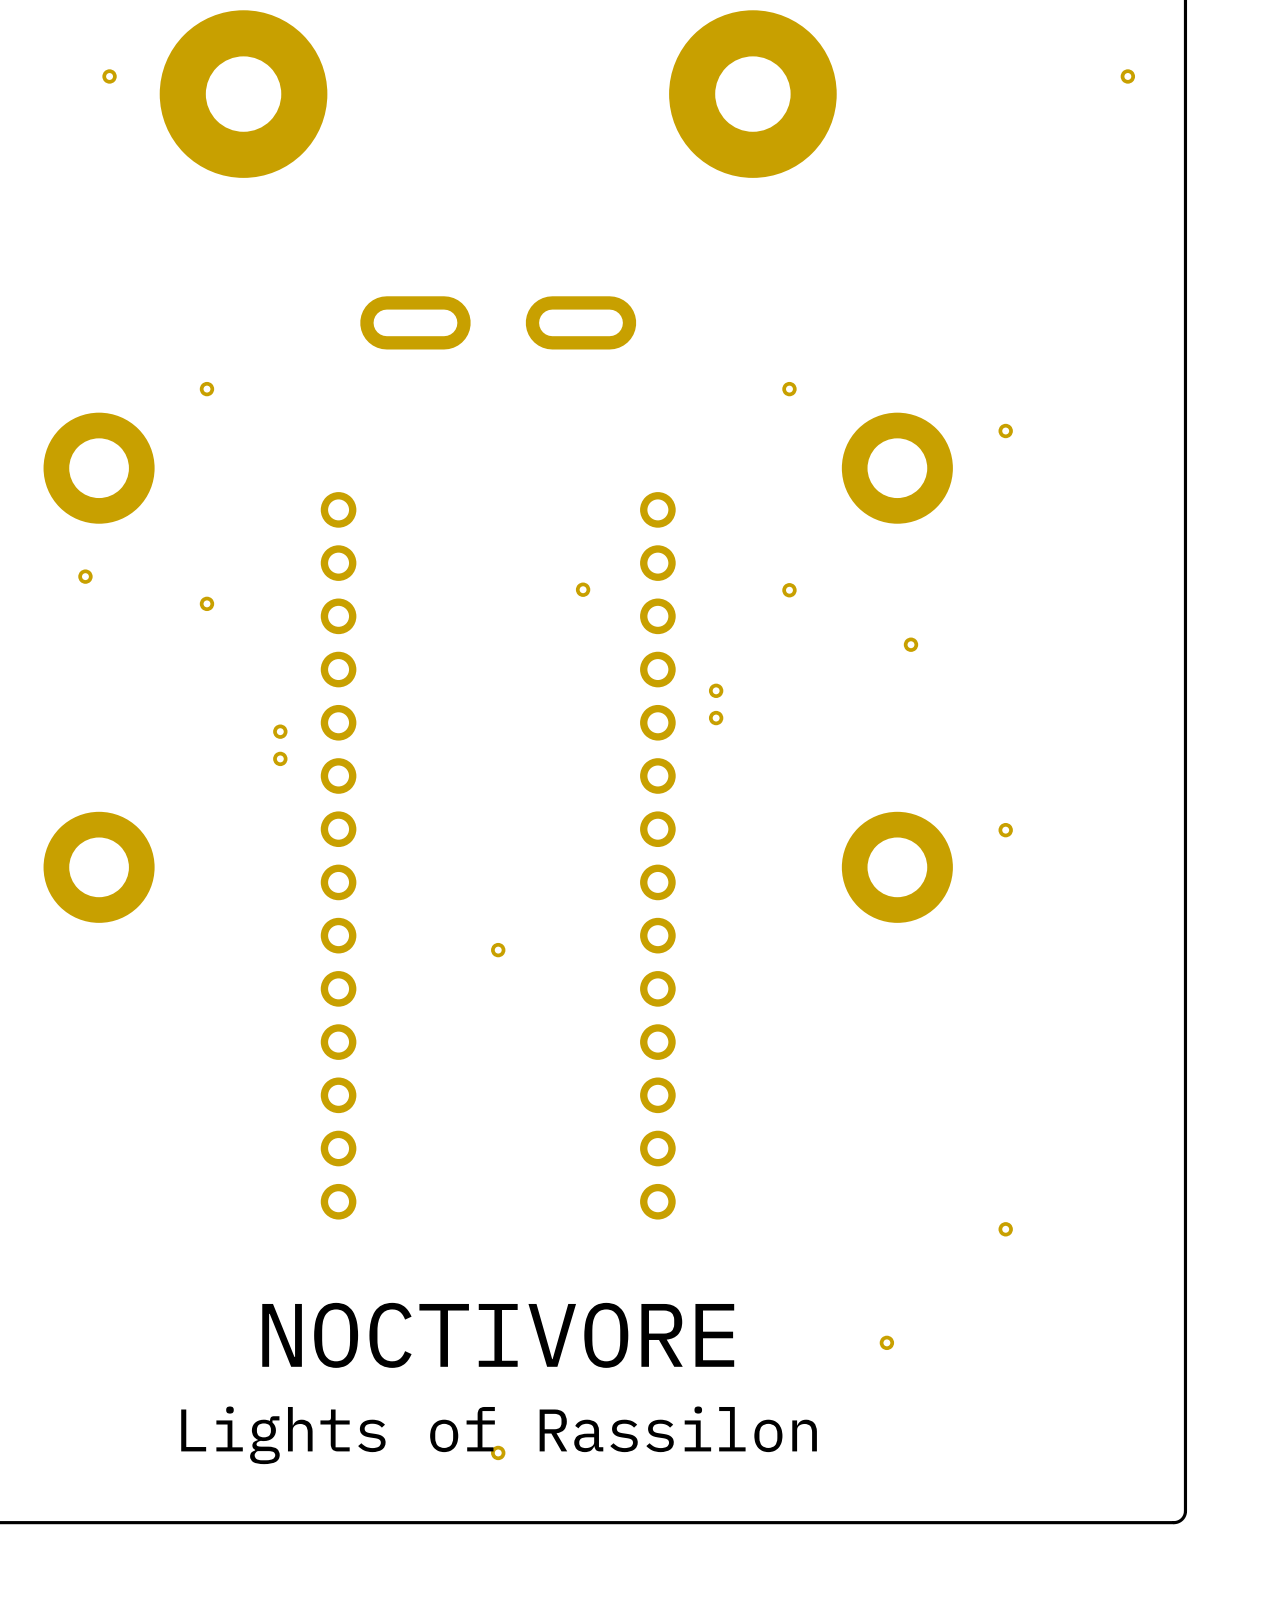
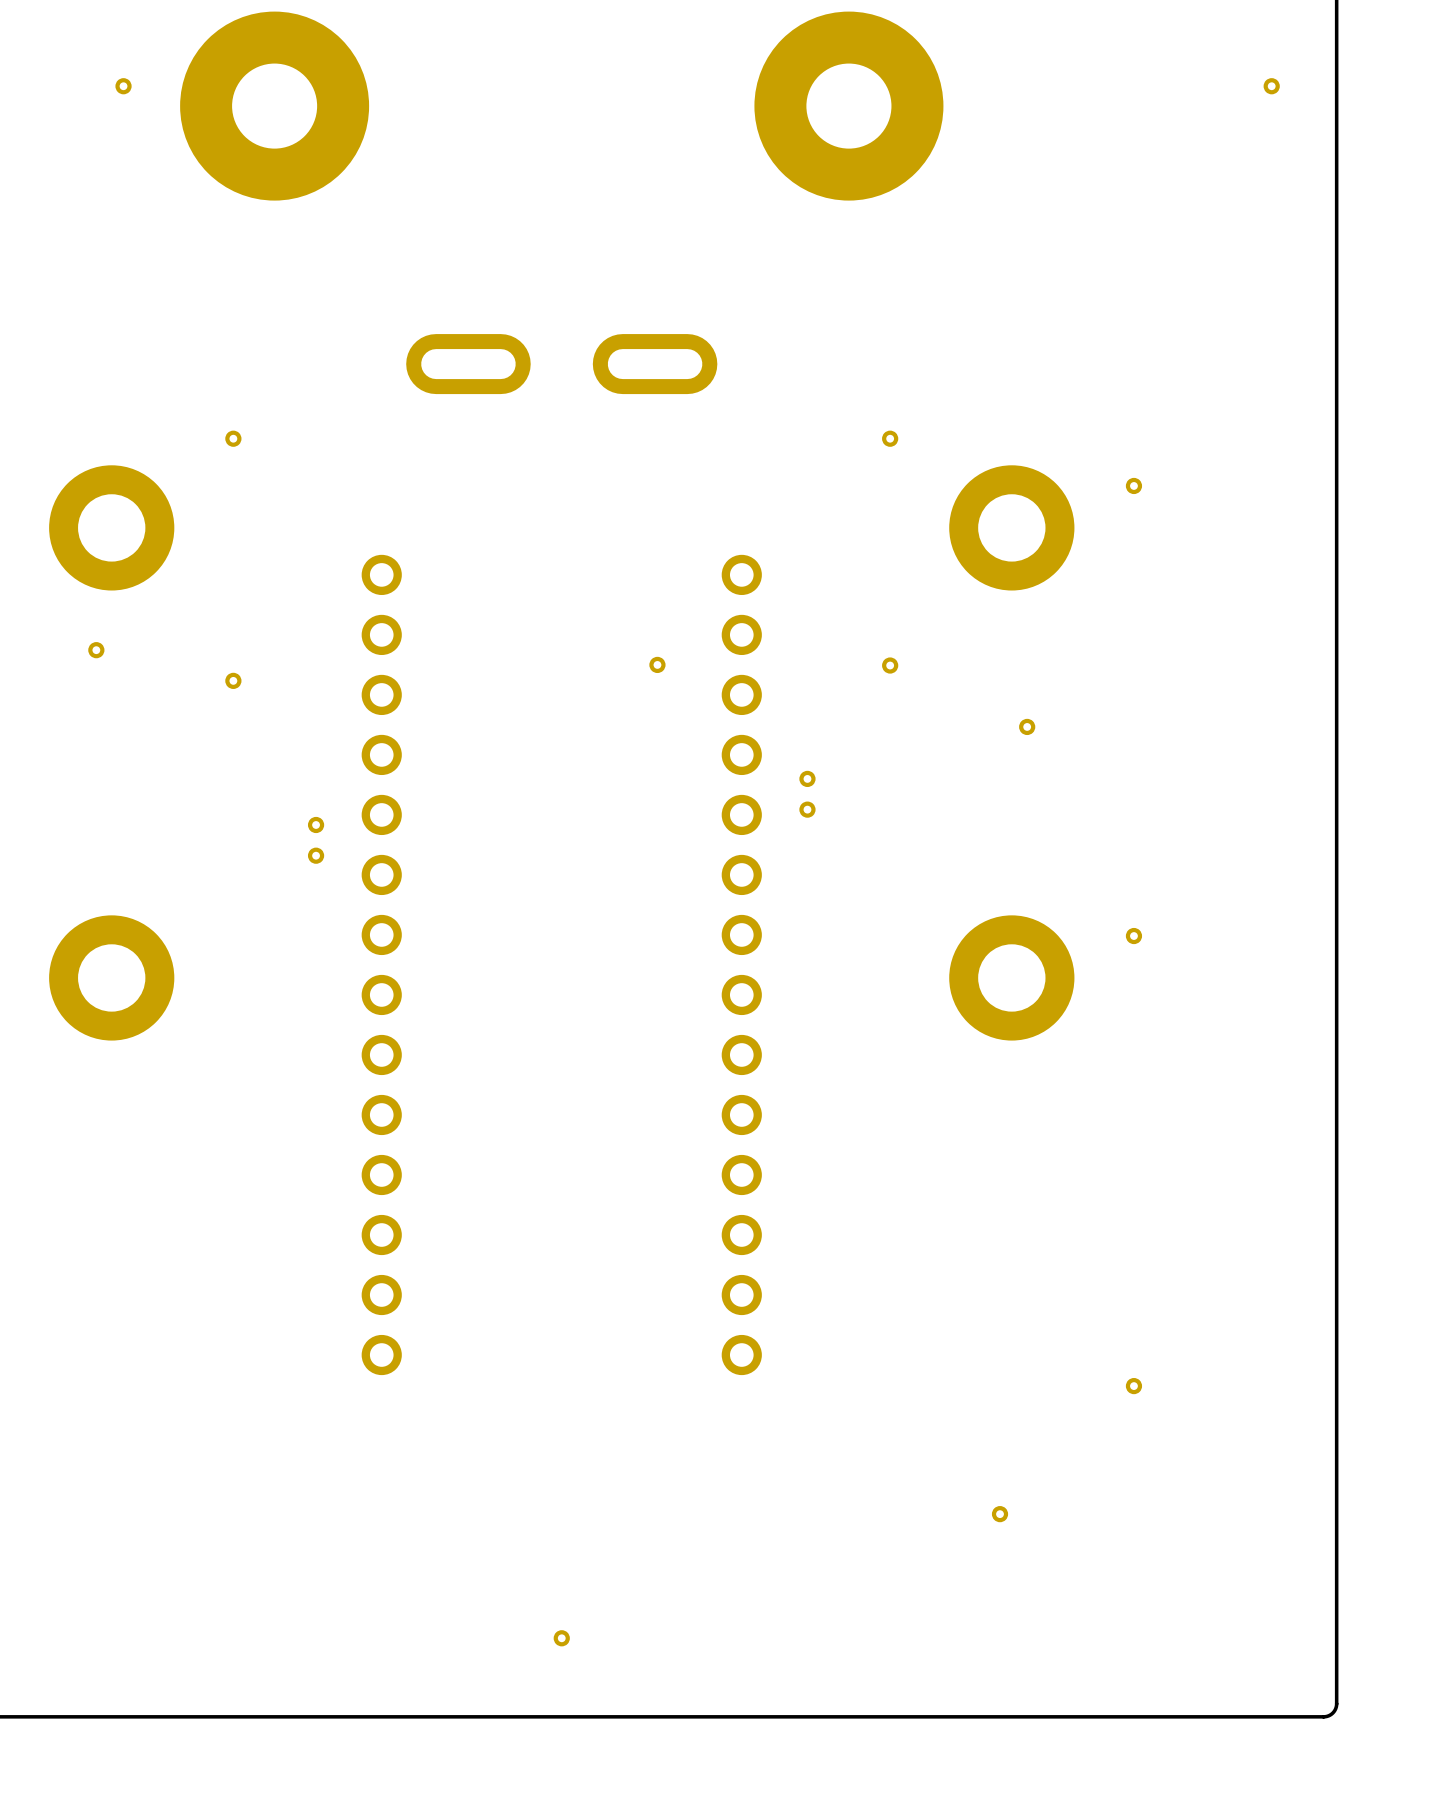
part: (498, 950) -> none
text: NOCTIVORE (498, 1335) -> none
text: Lights of Rassilon (499, 1435) -> none

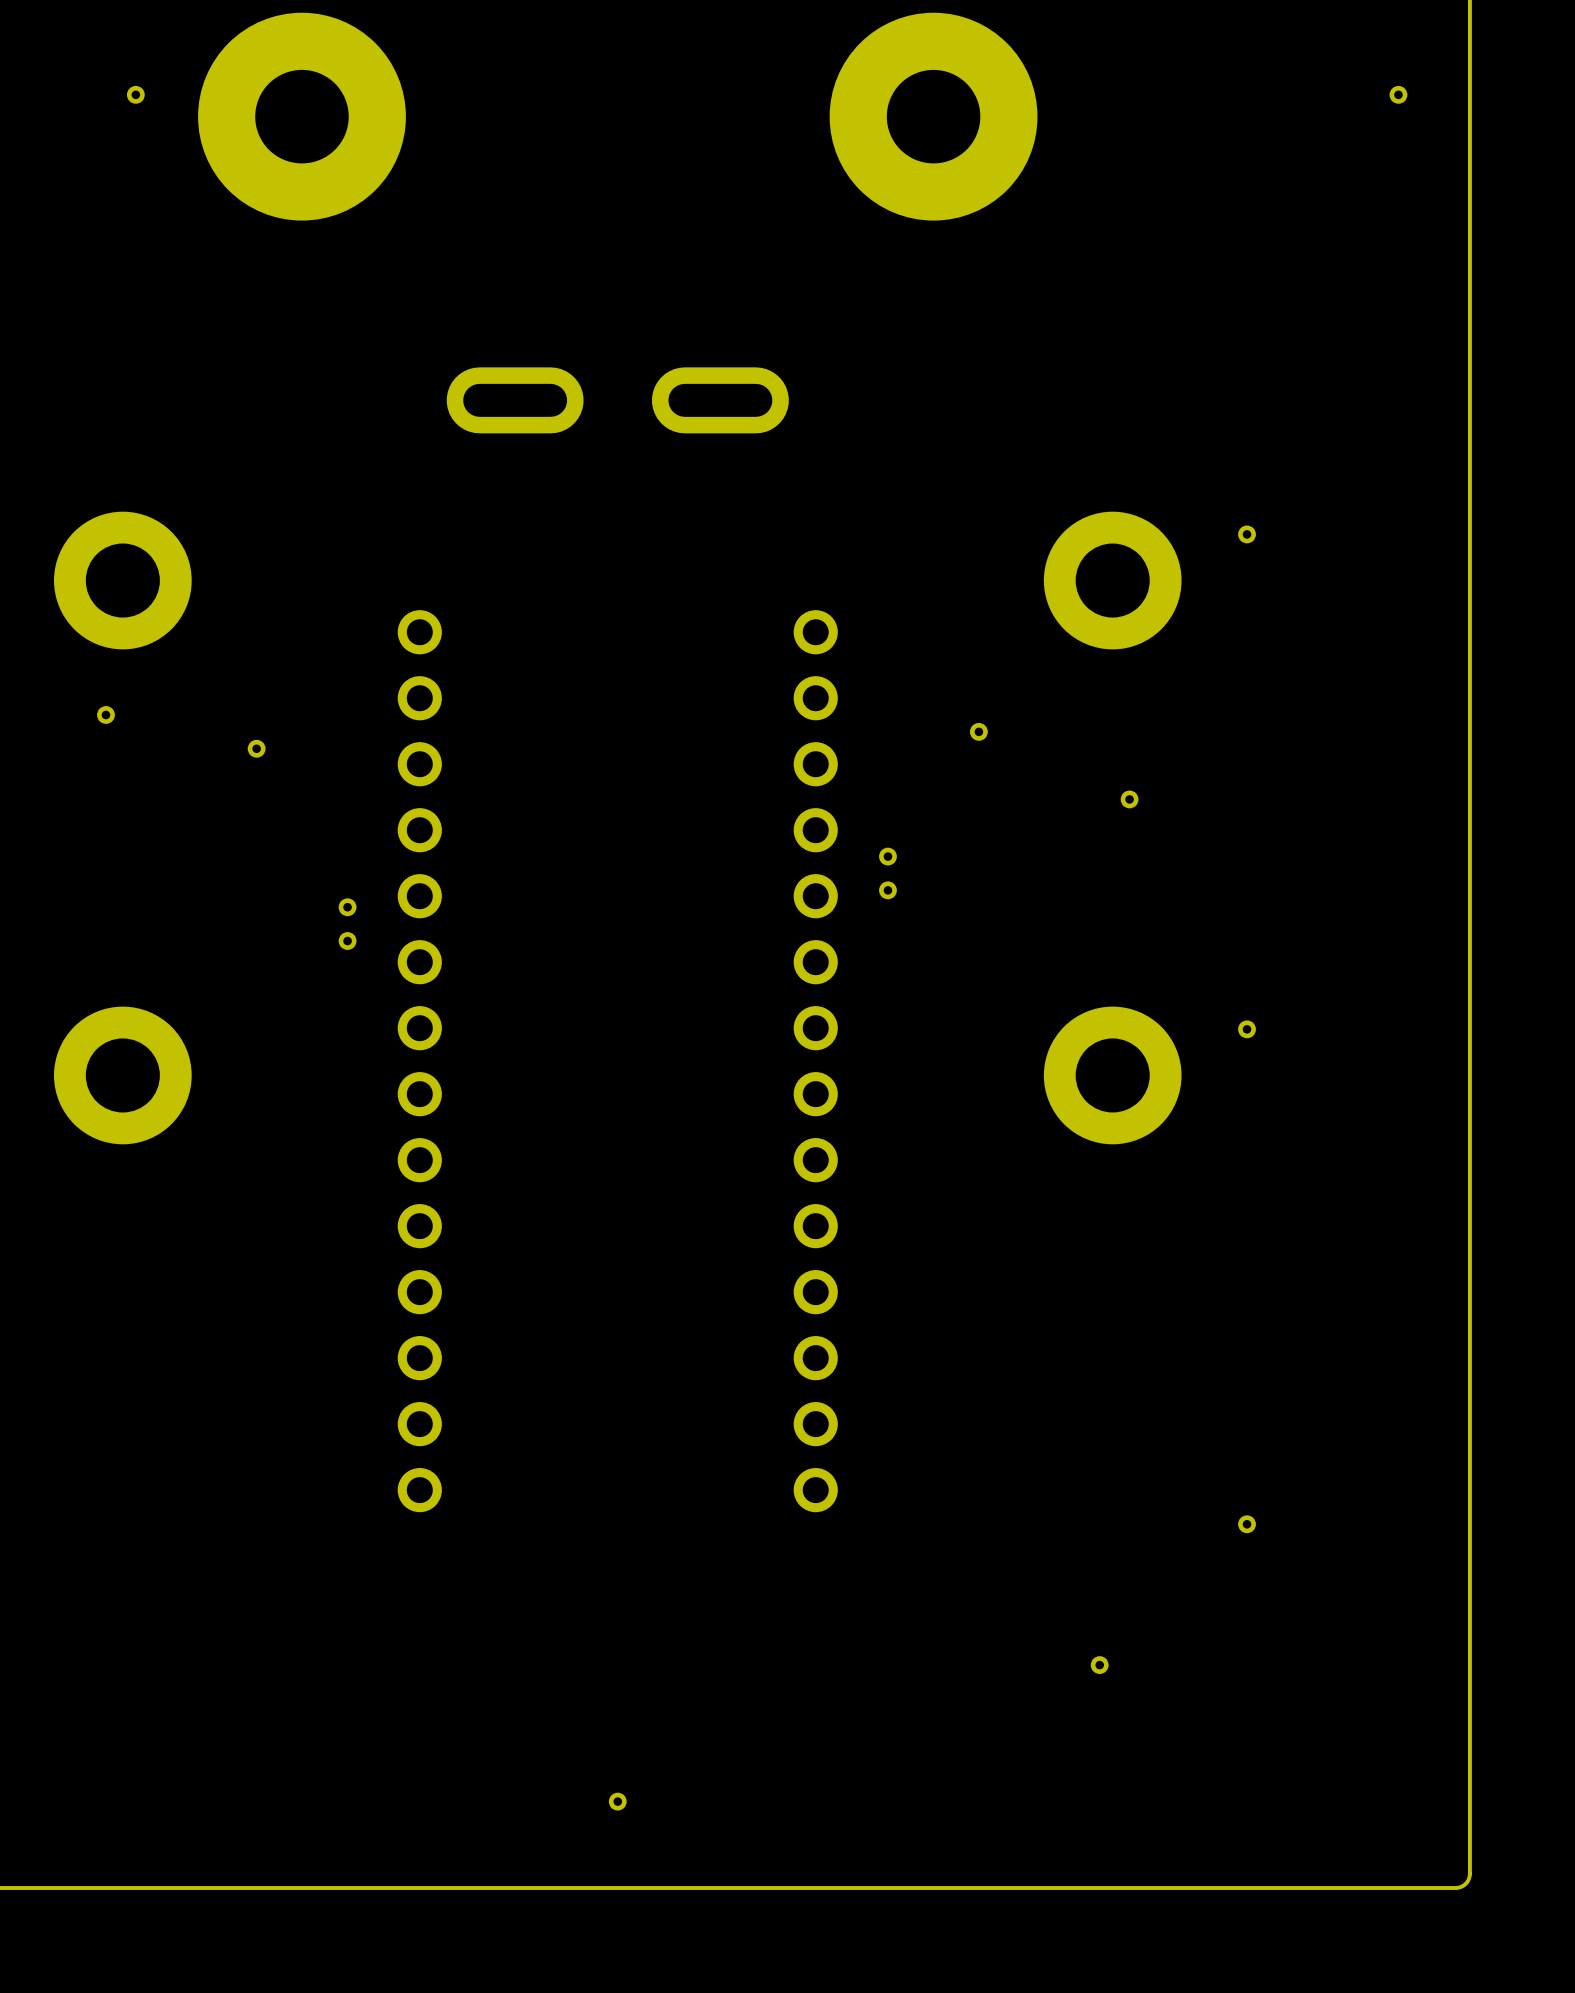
part: (233, 438) -> none
part: (890, 438) -> none
part: (657, 664) -> none

